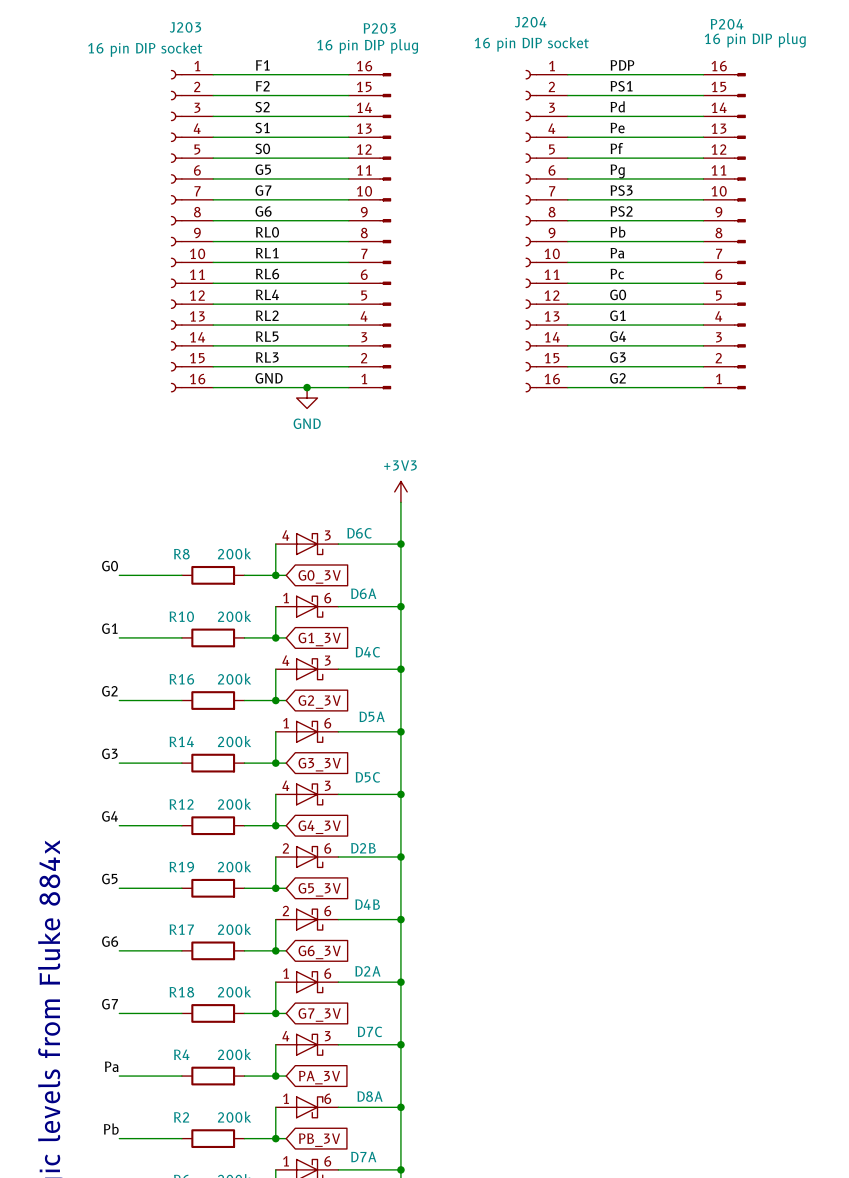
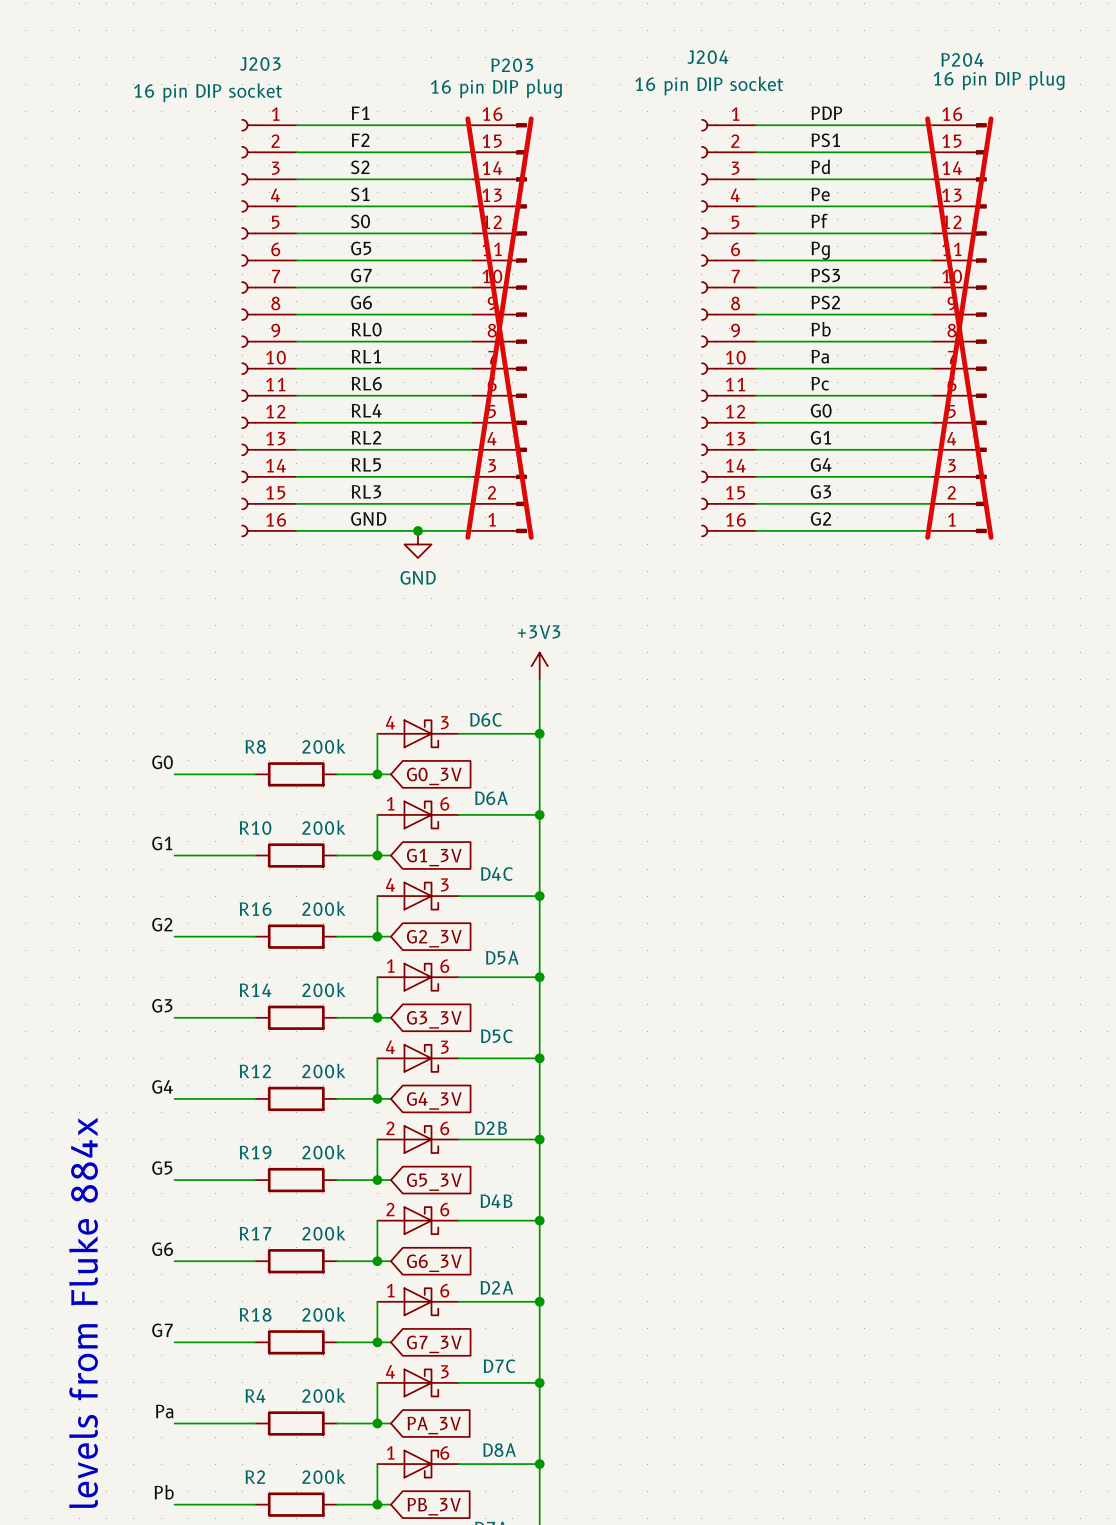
P203 do-not-place cross: none -> (499, 328)
P204 do-not-place cross: none -> (959, 328)

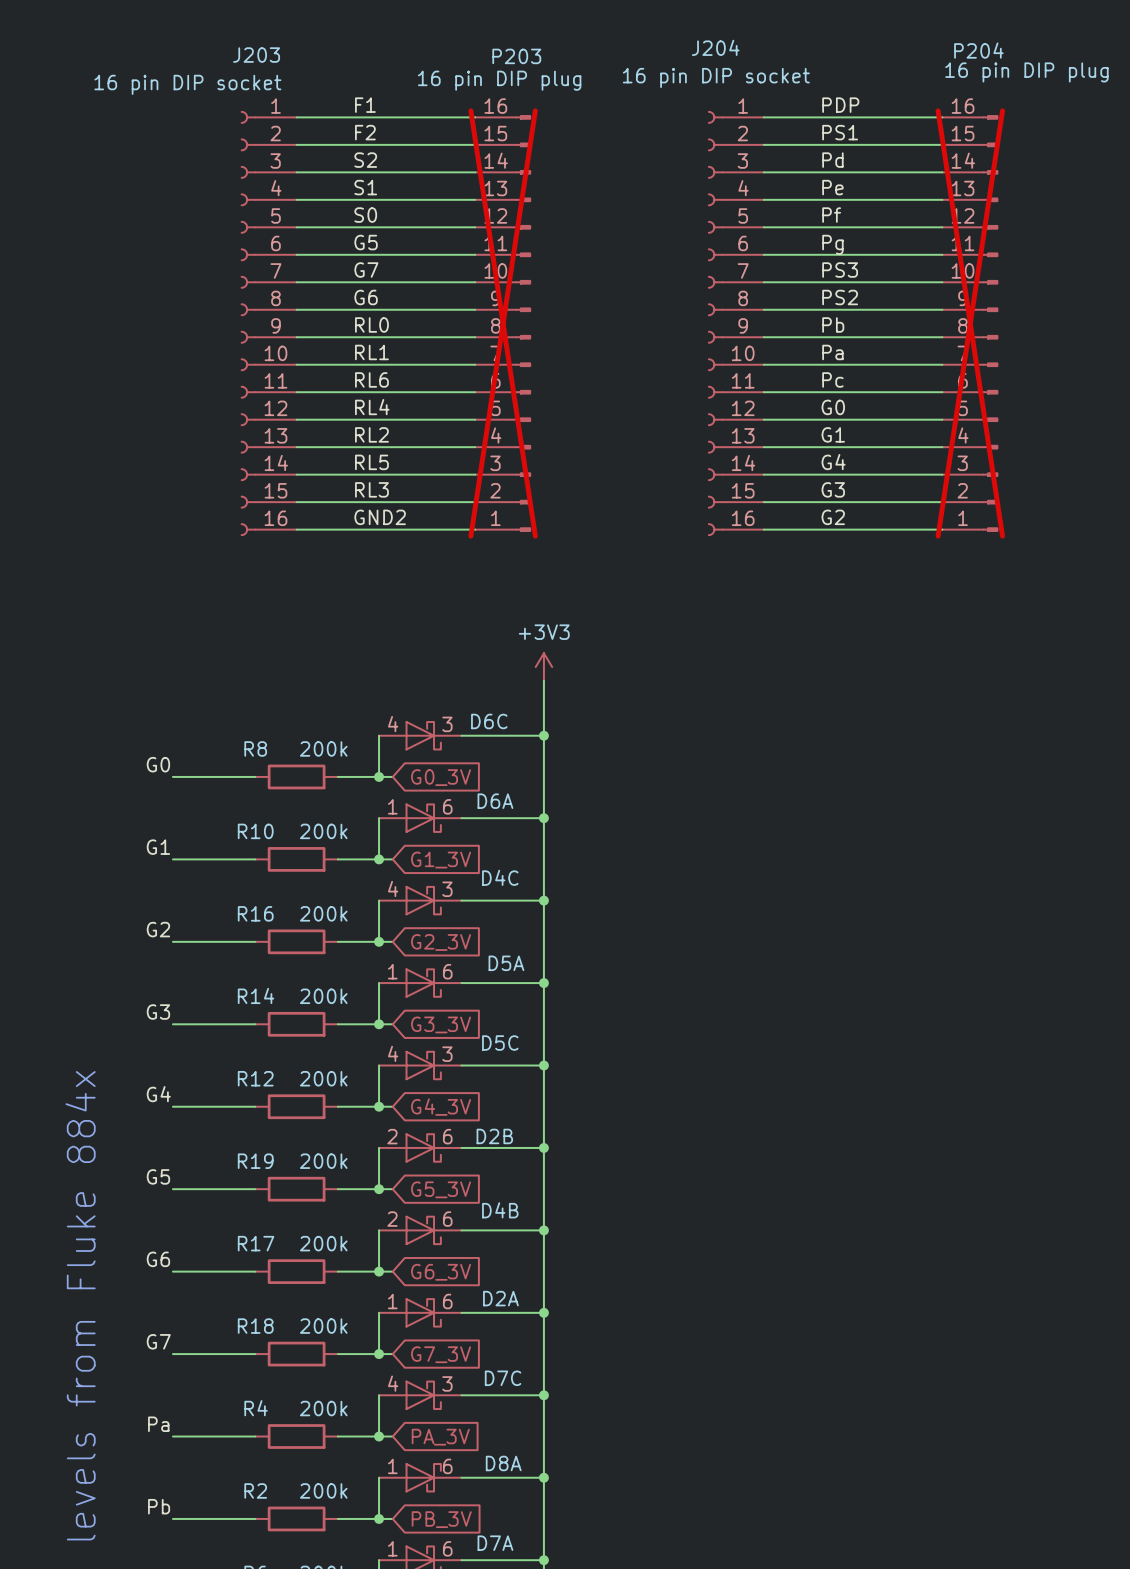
label: GND (368, 518) -> GND2 (380, 517)
junction: (417, 530) -> none
power symbol: GND (417, 544) -> none

